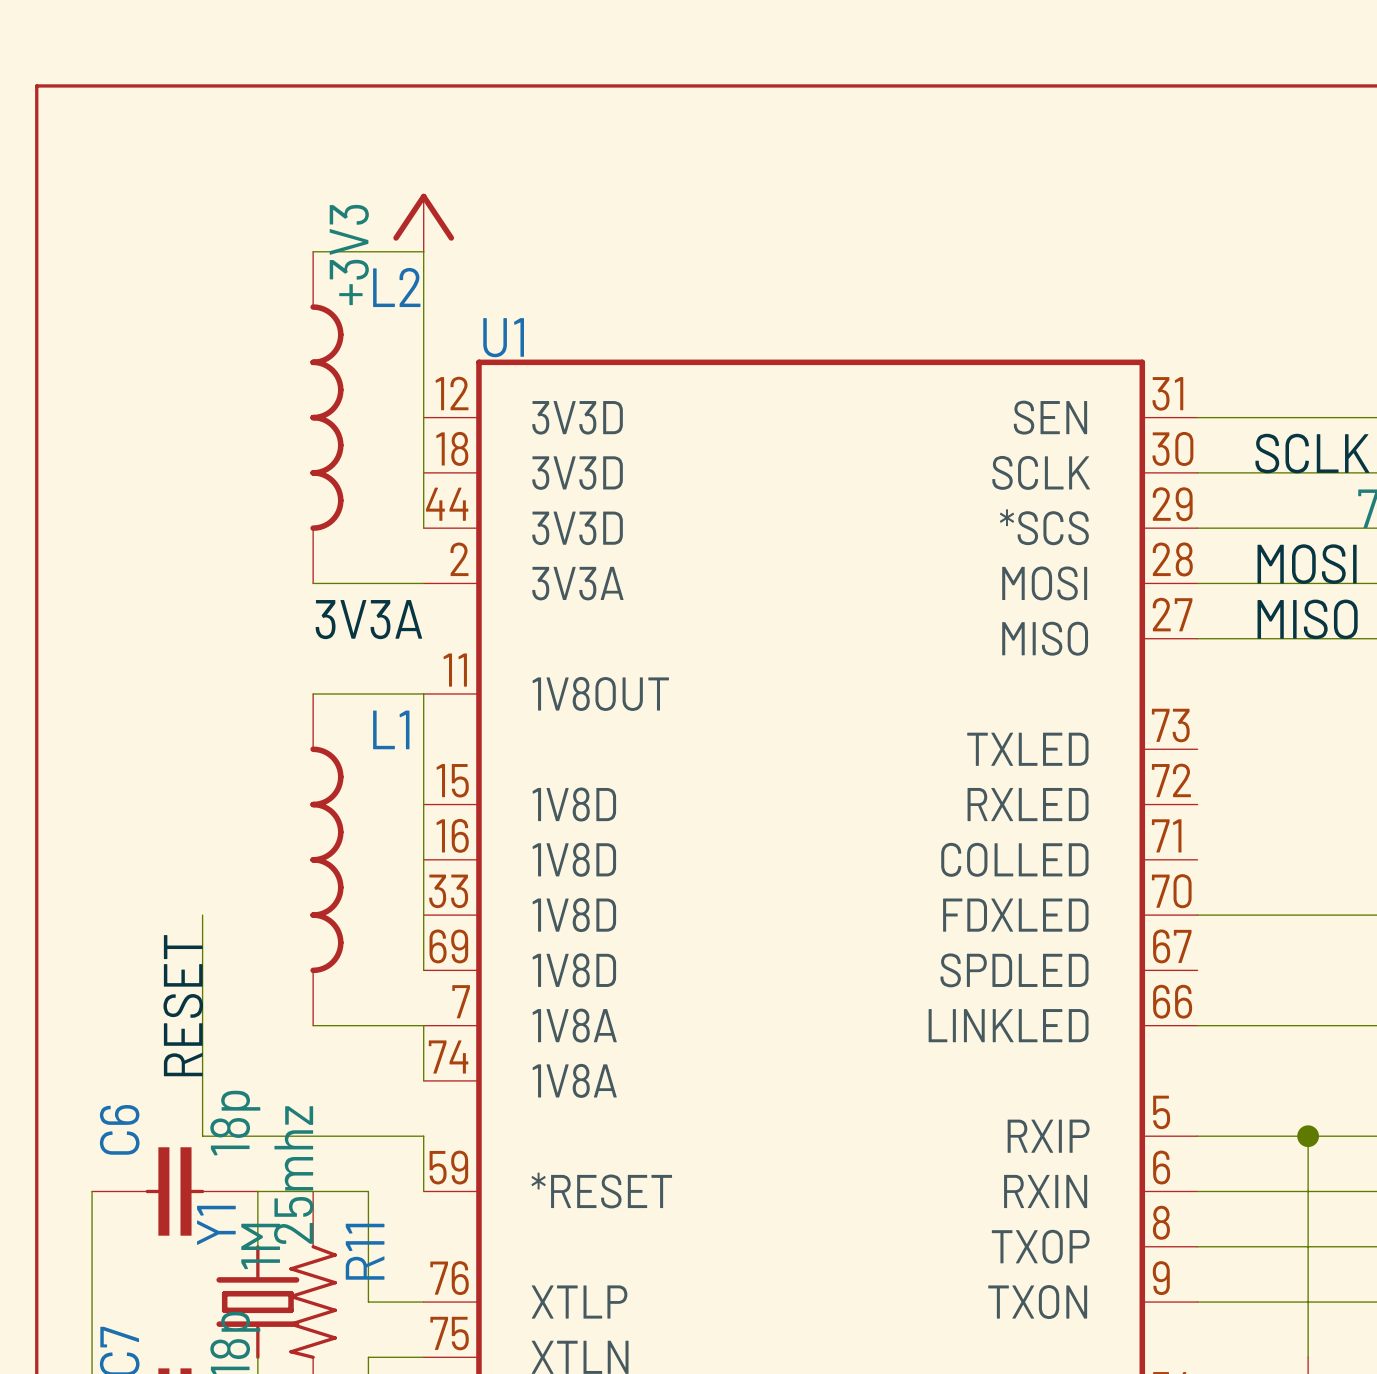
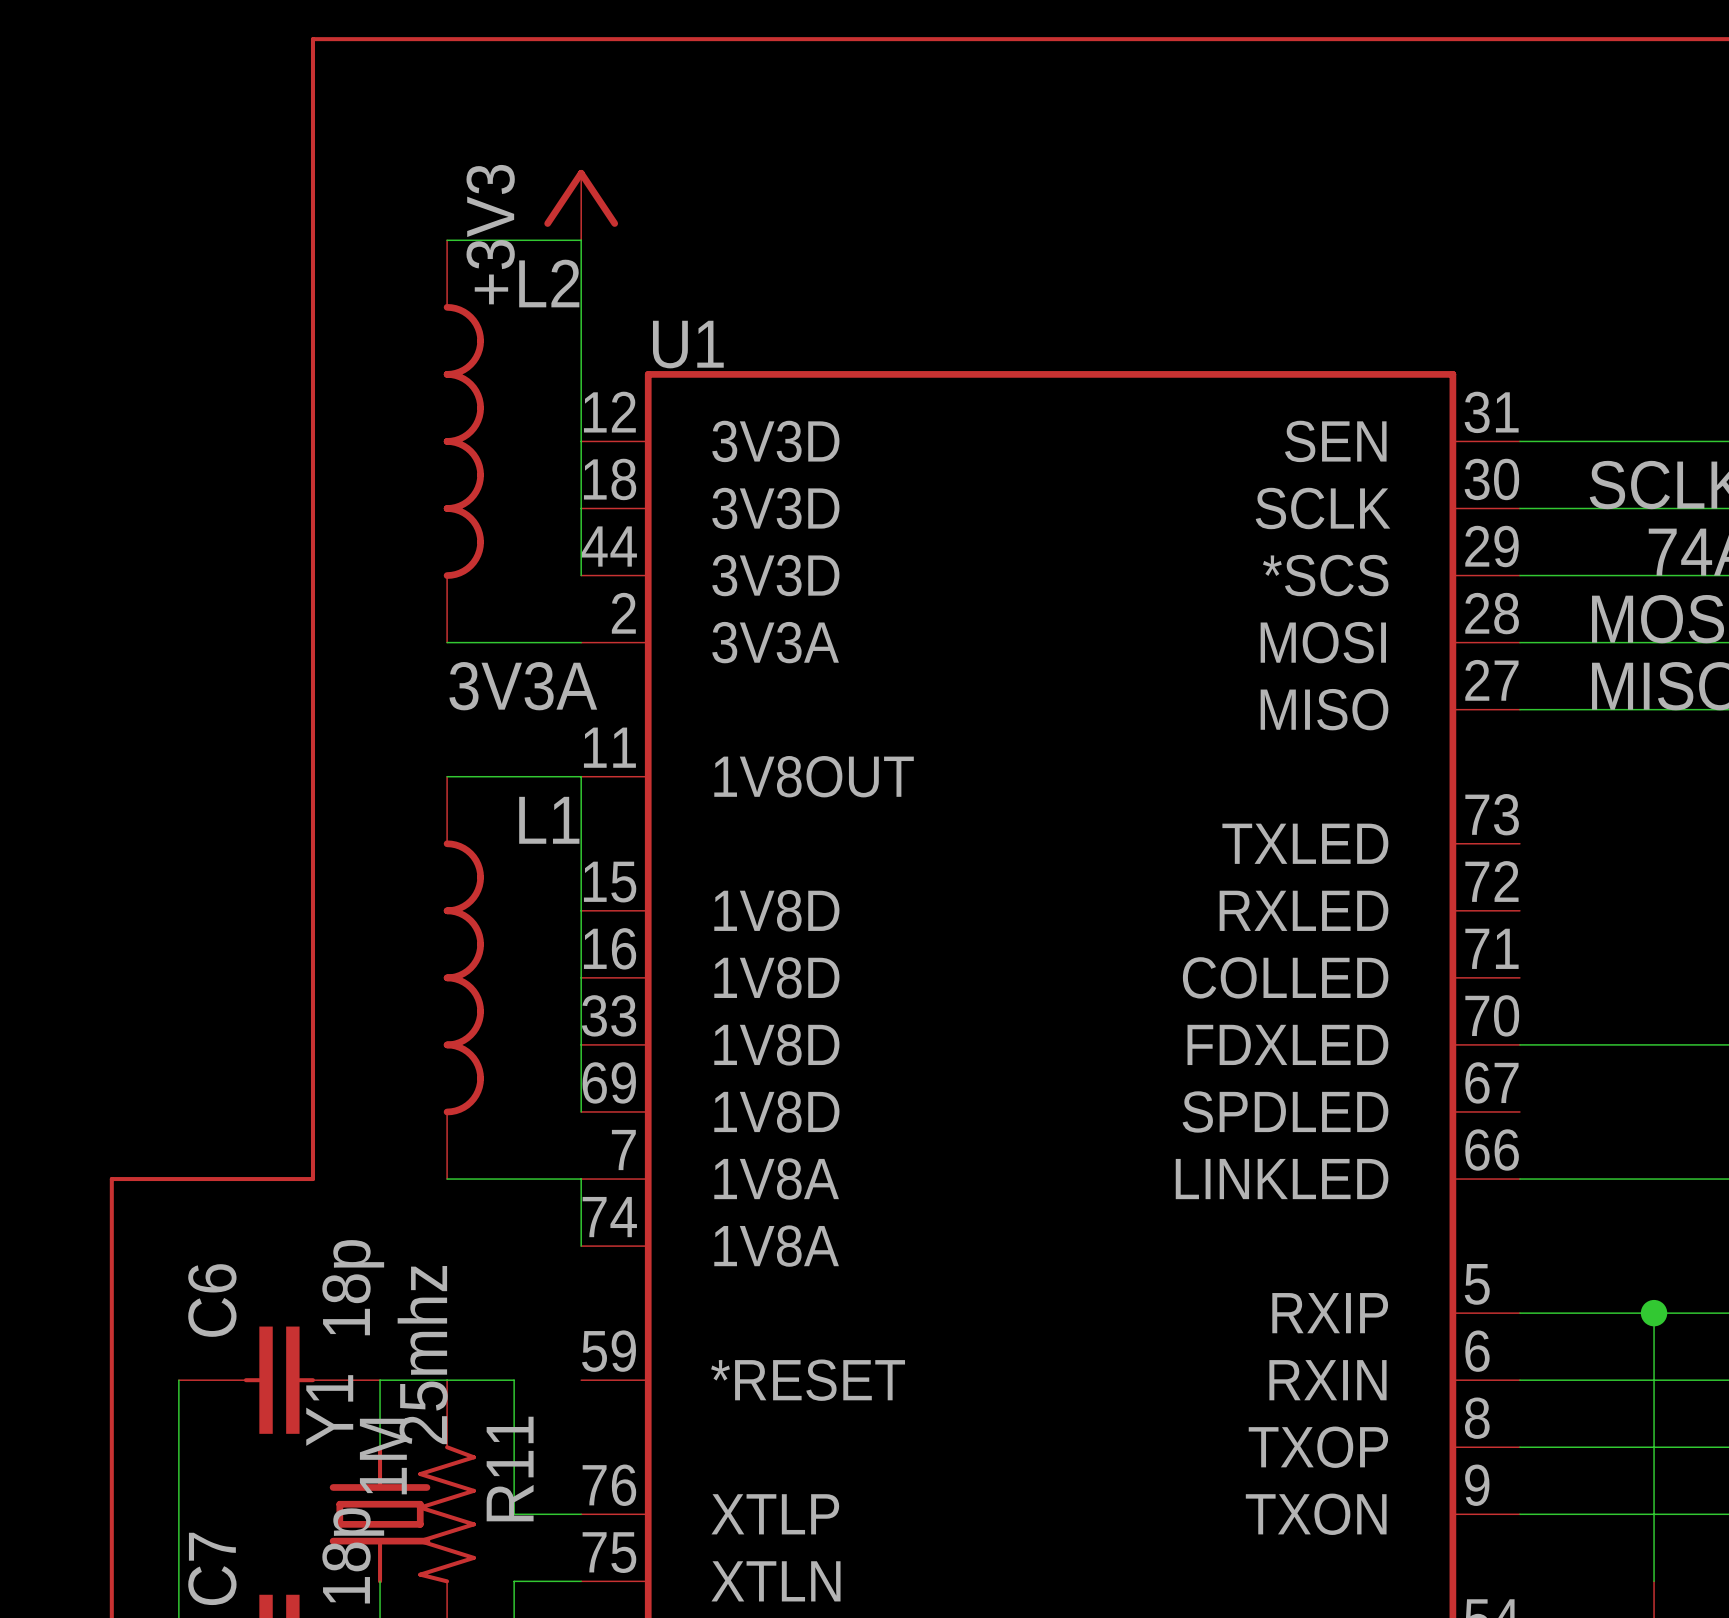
line: (202, 85) (36, 85) (36, 1025) -> (312, 39) (312, 1179) (111, 1179)
wire: (202, 915) (202, 1136) (423, 1136) (423, 1191) -> none
label: RESET (183, 1005) -> none

